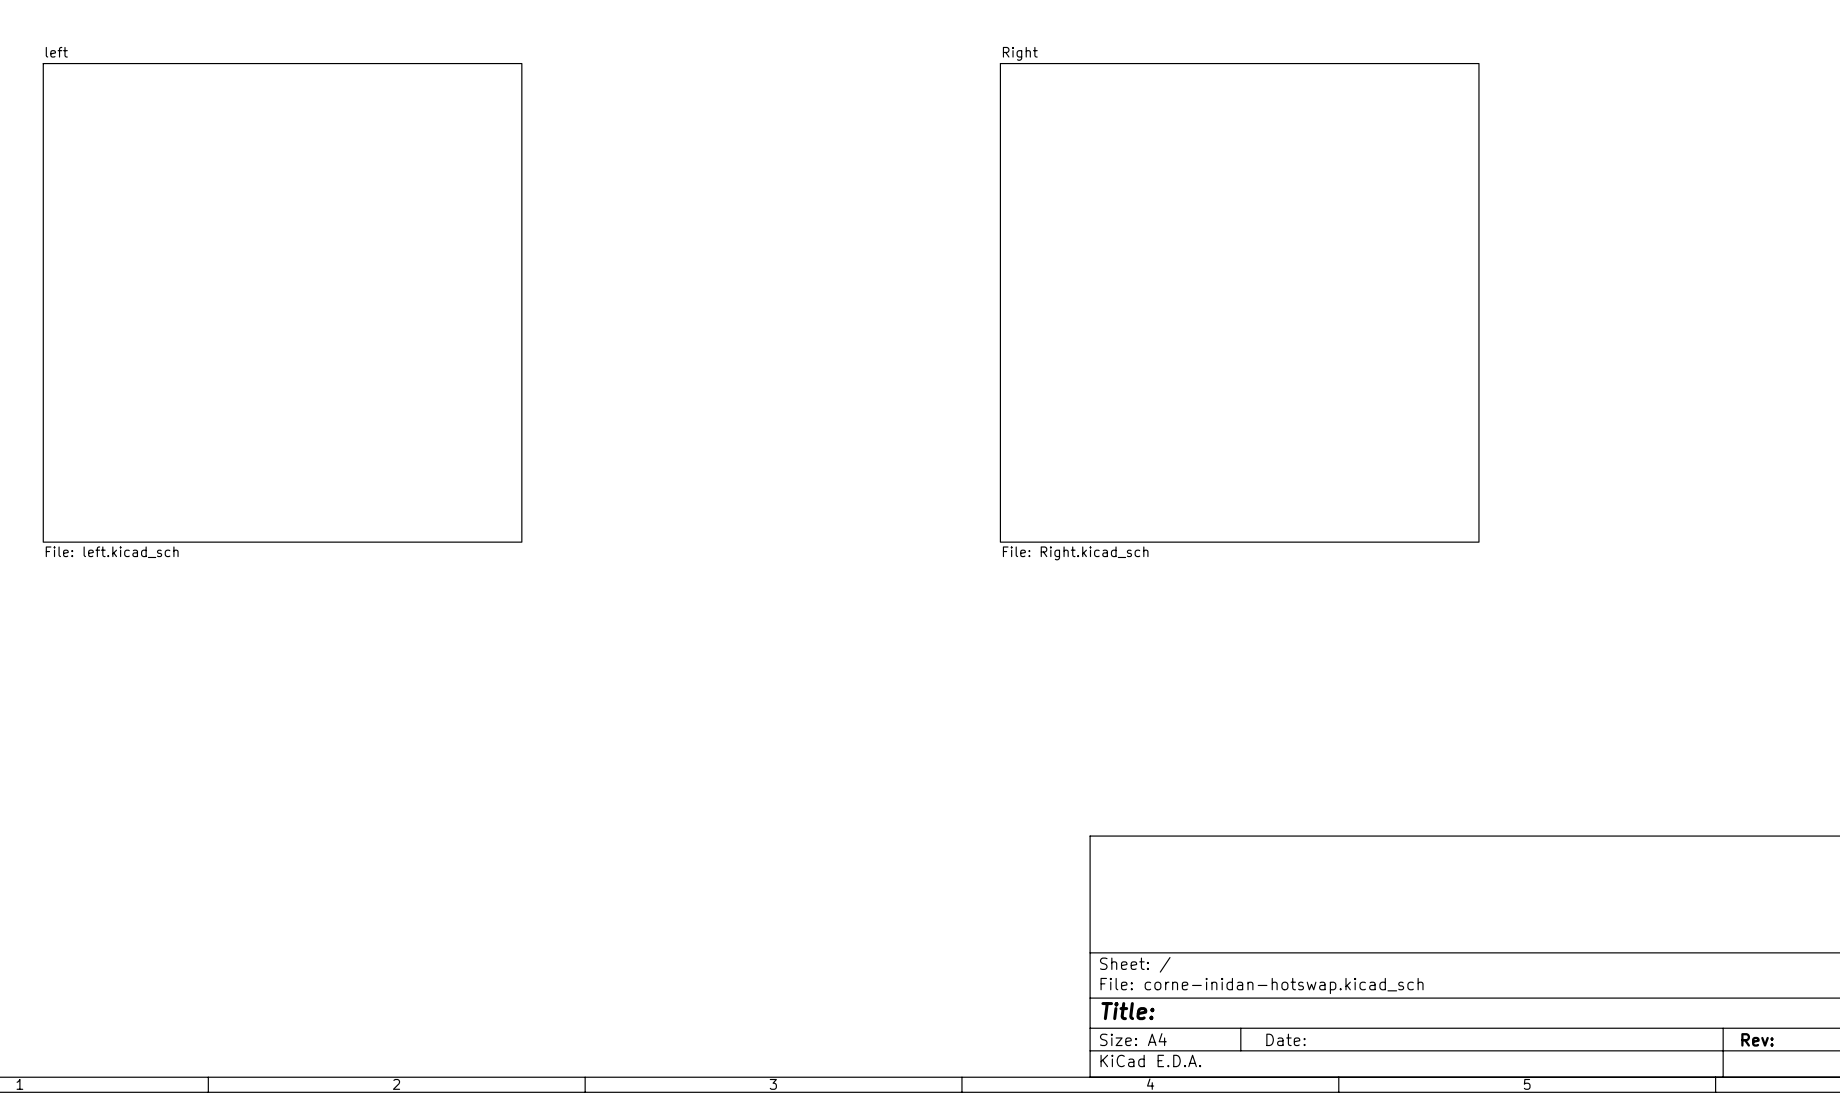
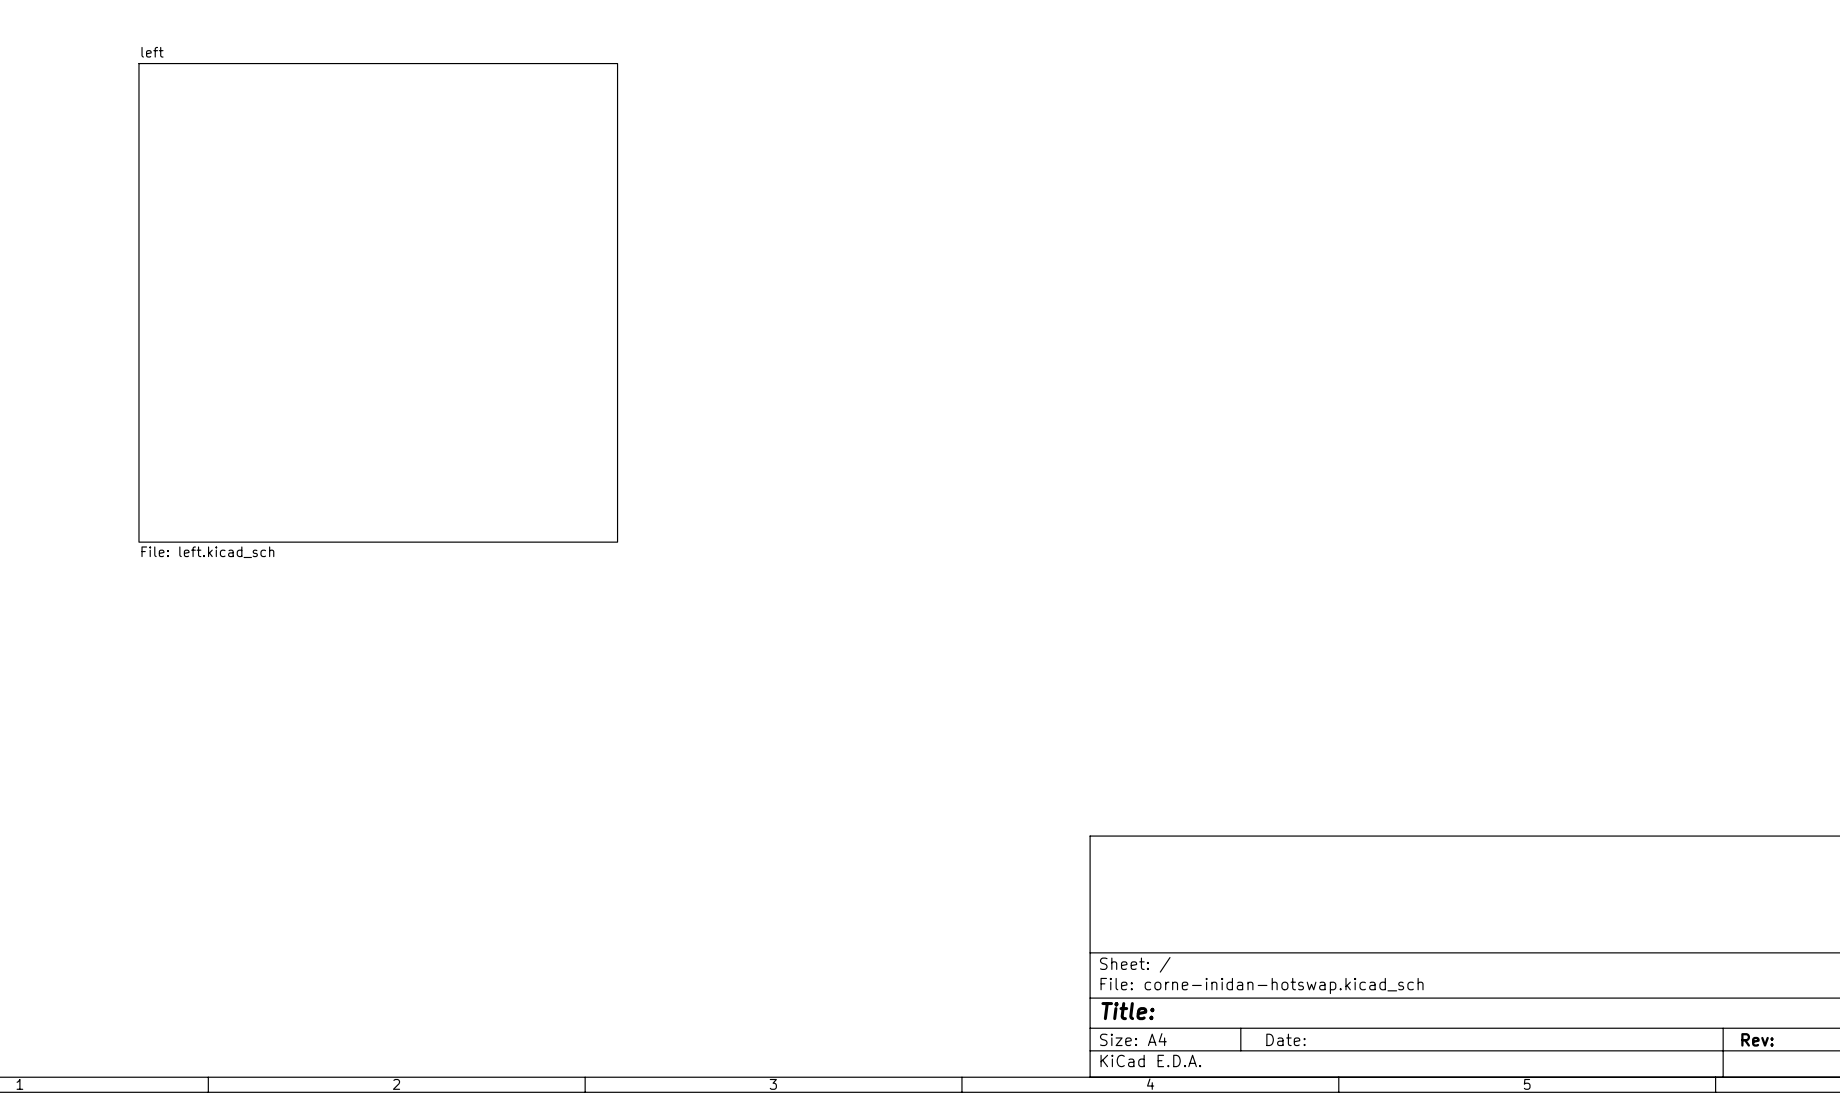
sheet left position: (282, 302) -> (378, 302)
sheet Right: File: Right.kicad_sch (1239, 302) -> none

